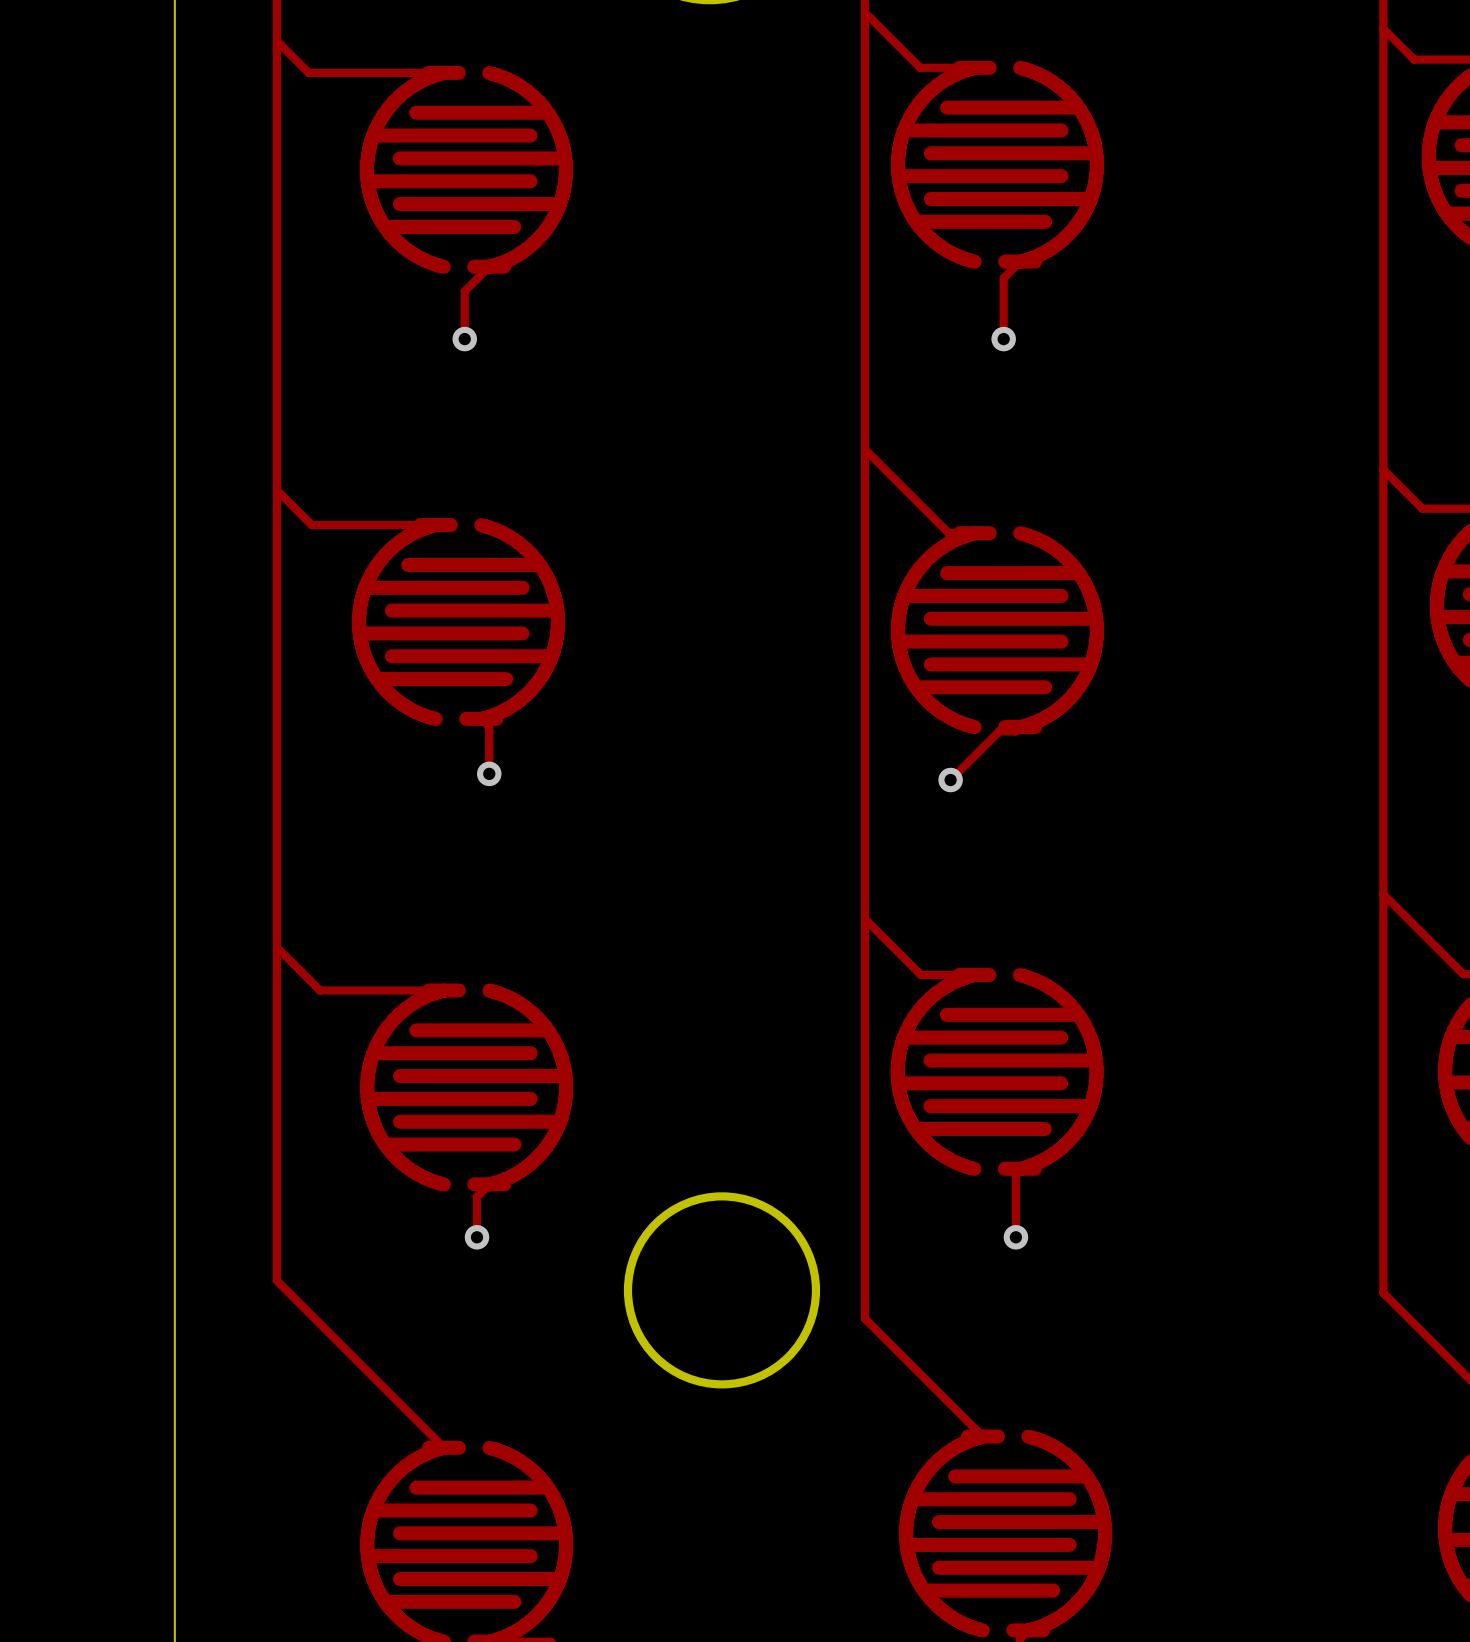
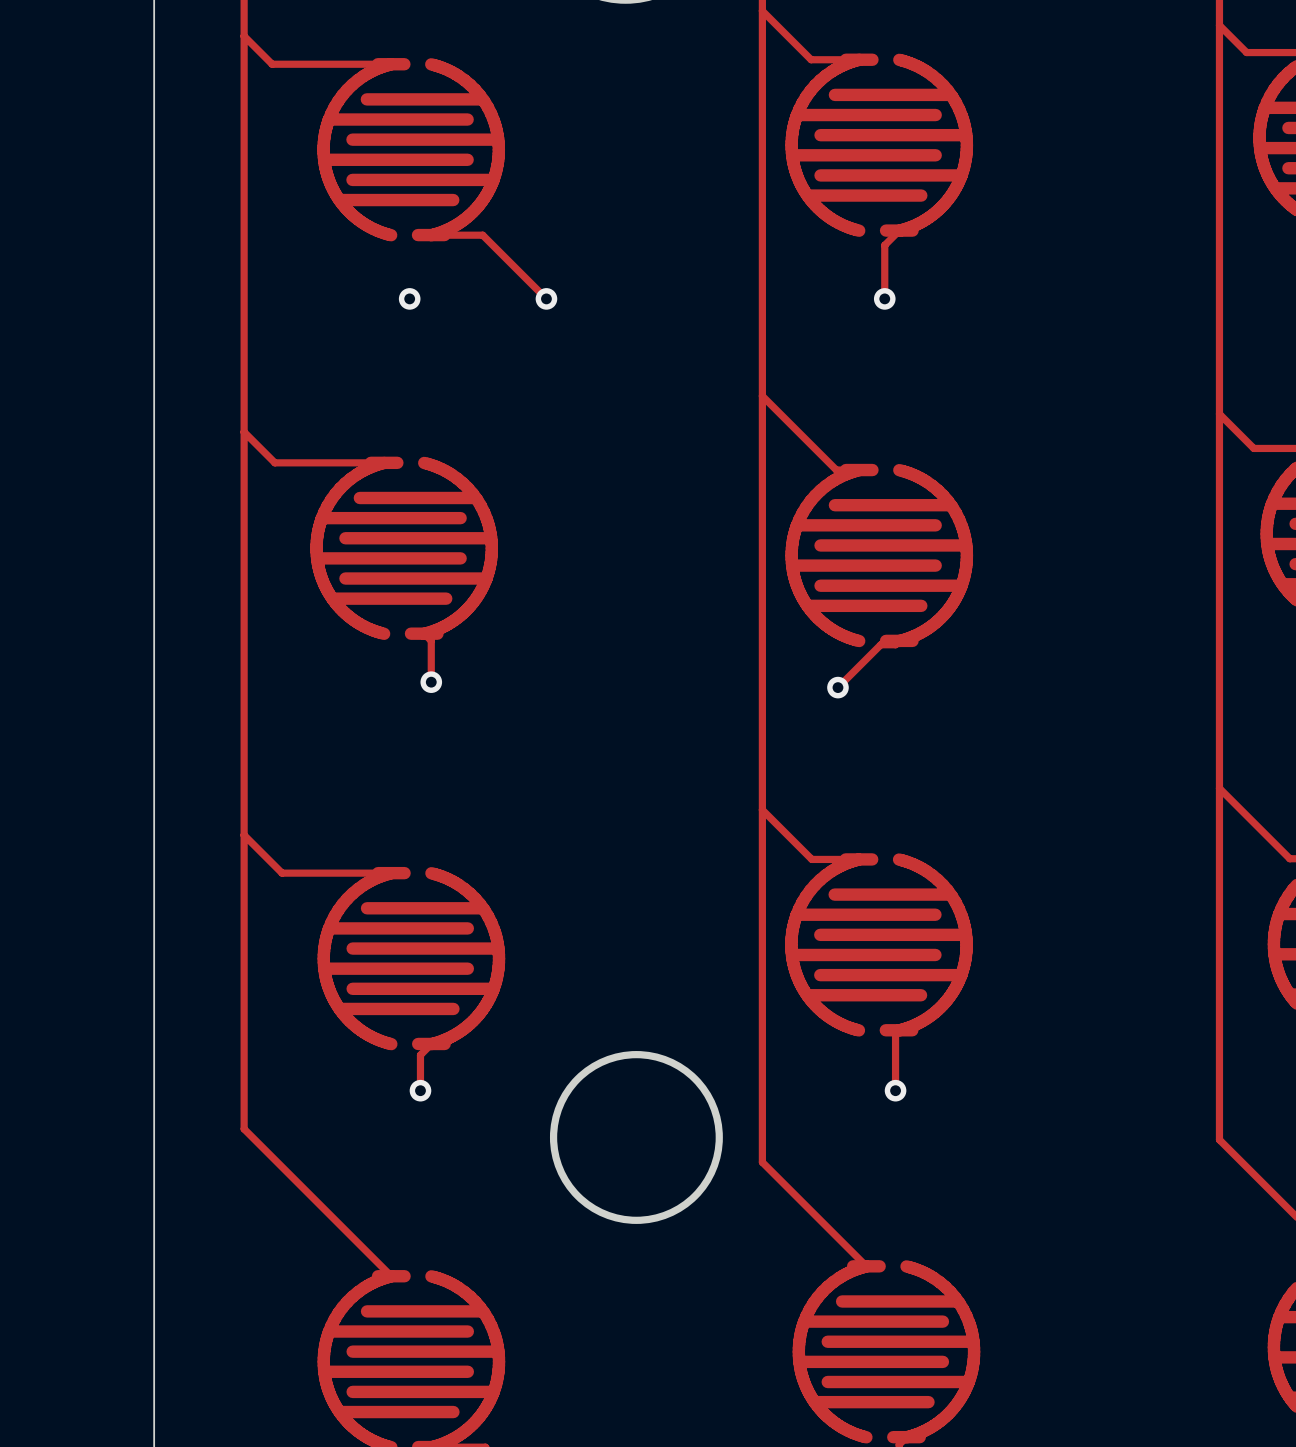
track: (489, 266) (464, 291) (464, 339) -> (431, 235) (482, 235) (546, 298)
via: none -> (546, 298)

